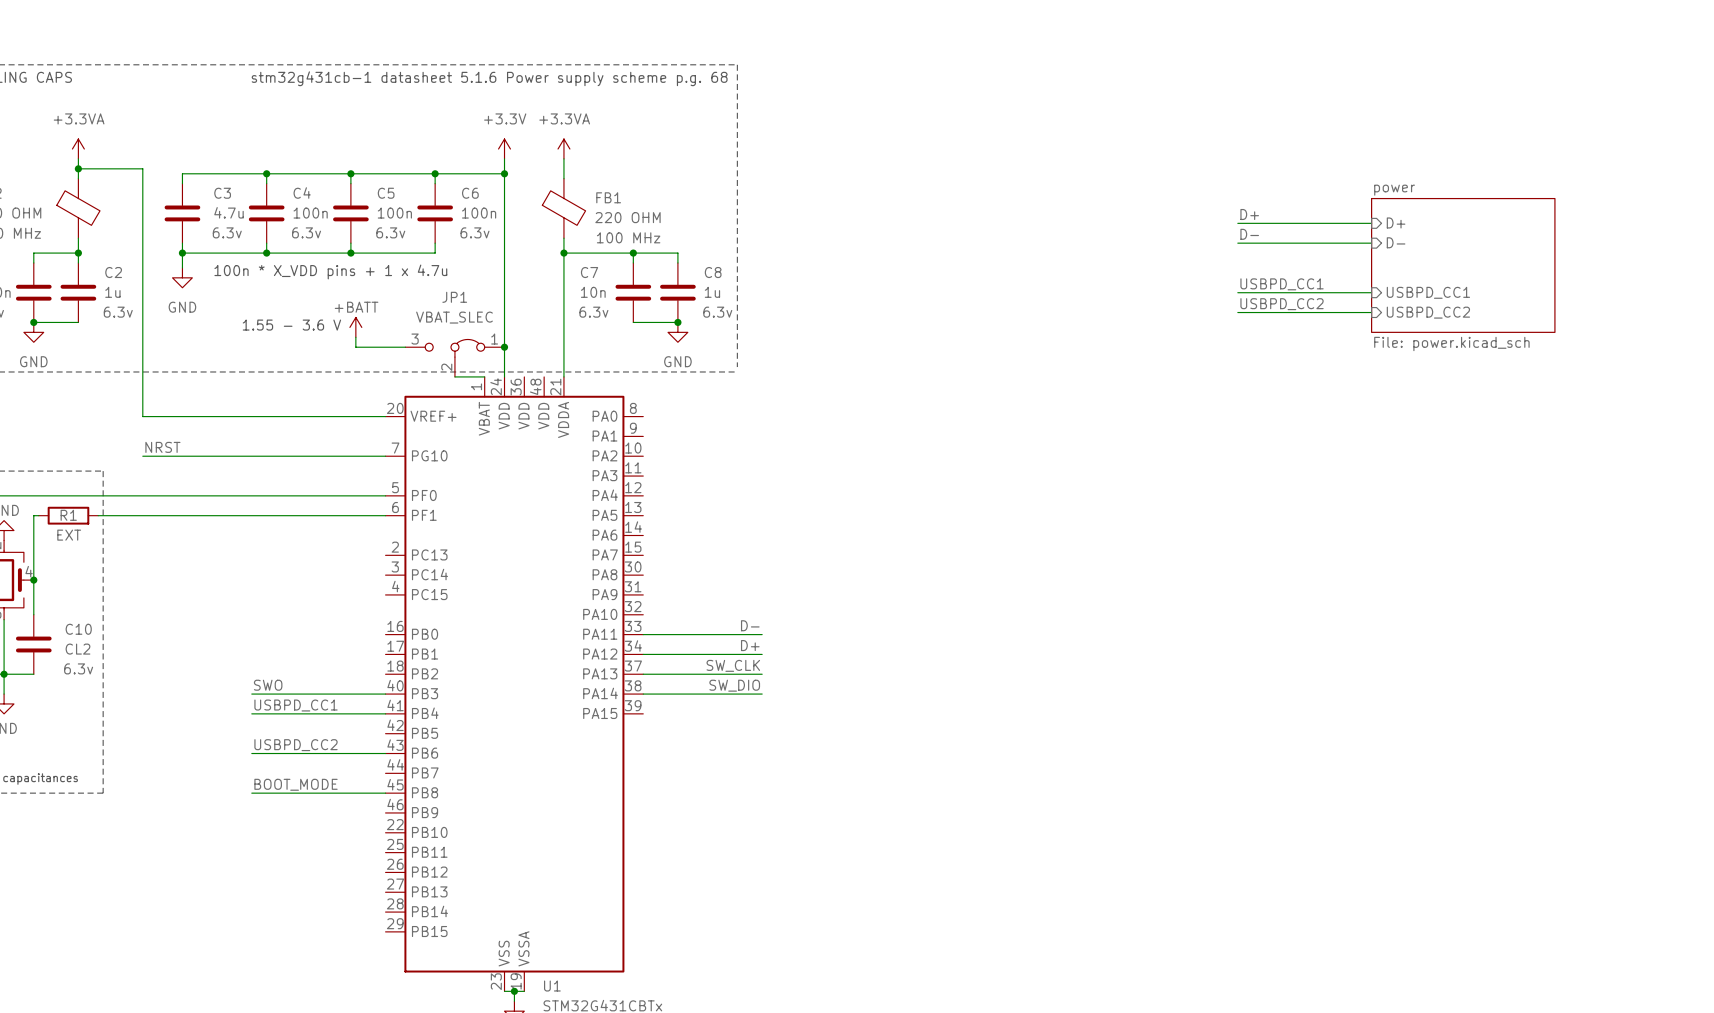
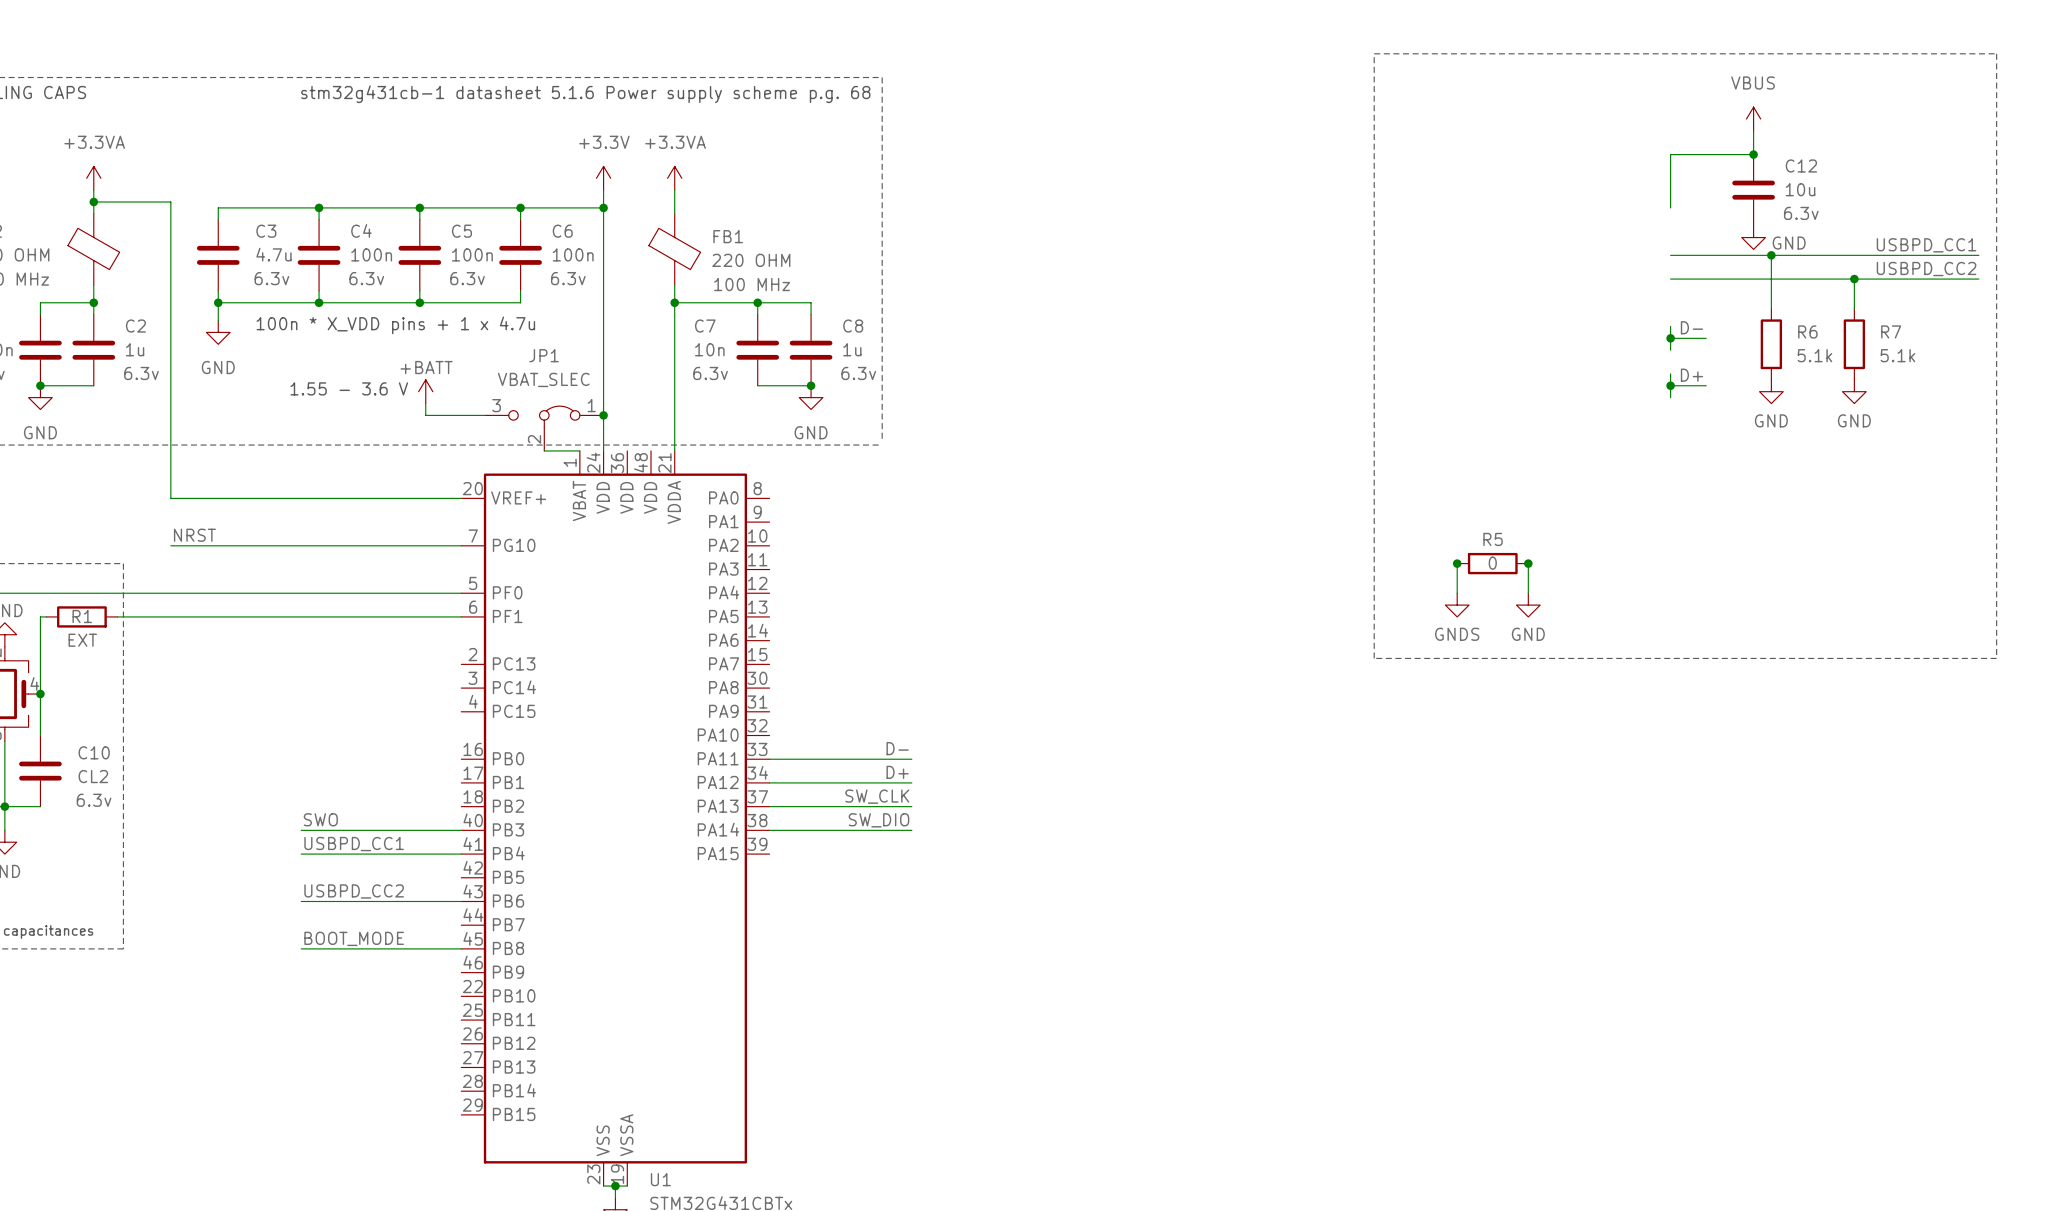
line: none -> (1374, 53) (1996, 53) (1996, 658) (1374, 658) (1374, 53)
power symbol: none -> VBUS (1753, 119)
wire: none -> (1753, 130) (1753, 154) (1670, 154) (1670, 207)
junction: none -> (1753, 154)
C12: none -> 10u (1753, 190)
power symbol: none -> GND (1753, 237)
label: none -> USBPD_CC1 (1926, 245)
wire: none -> (1670, 255) (1978, 255)
wire: none -> (1771, 255) (1771, 308)
junction: none -> (1771, 255)
label: D+ (1249, 214) -> none
sheet pin: D+ (1396, 222) -> none
wire: (1237, 223) (1371, 223) -> none
label: none -> USBPD_CC2 (1926, 269)
wire: none -> (1670, 279) (1978, 279)
wire: none -> (1854, 279) (1854, 308)
junction: none -> (1854, 279)
label position: D- (1249, 234) -> D- (1691, 327)
sheet pin: D- (1396, 242) -> none
wire: (1237, 243) (1371, 243) -> none
sheet power: File: power.kicad_sch (1463, 265) -> none
wire: none -> (1670, 326) (1670, 350)
wire: none -> (1670, 338) (1706, 338)
junction: none -> (1670, 338)
label: USBPD_CC1 (1282, 284) -> none
R6: none -> 5.1k (1771, 344)
R7: none -> 5.1k (1854, 344)
wire: (1237, 292) (1371, 292) -> none
sheet pin: USBPD_CC1 (1428, 292) -> none
label: USBPD_CC2 (1282, 304) -> none
wire: (1237, 312) (1371, 312) -> none
wire: none -> (1670, 373) (1670, 397)
sheet pin: USBPD_CC2 (1428, 312) -> none
label: none -> D+ (1691, 375)
wire: none -> (1670, 385) (1706, 385)
junction: none -> (1670, 385)
power symbol: none -> GND (1771, 391)
power symbol: none -> GND (1854, 391)
wire: none -> (1457, 563) (1457, 593)
junction: none -> (1457, 563)
R5: none -> 0 (1492, 563)
wire: none -> (1528, 563) (1528, 593)
junction: none -> (1528, 563)
power symbol: none -> GNDS (1457, 605)
power symbol: none -> GND (1528, 605)

